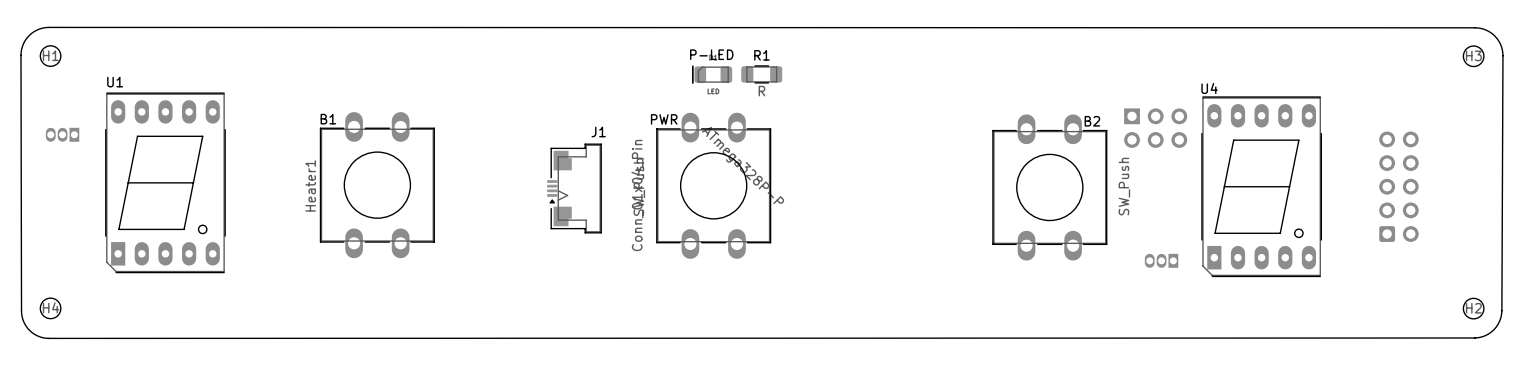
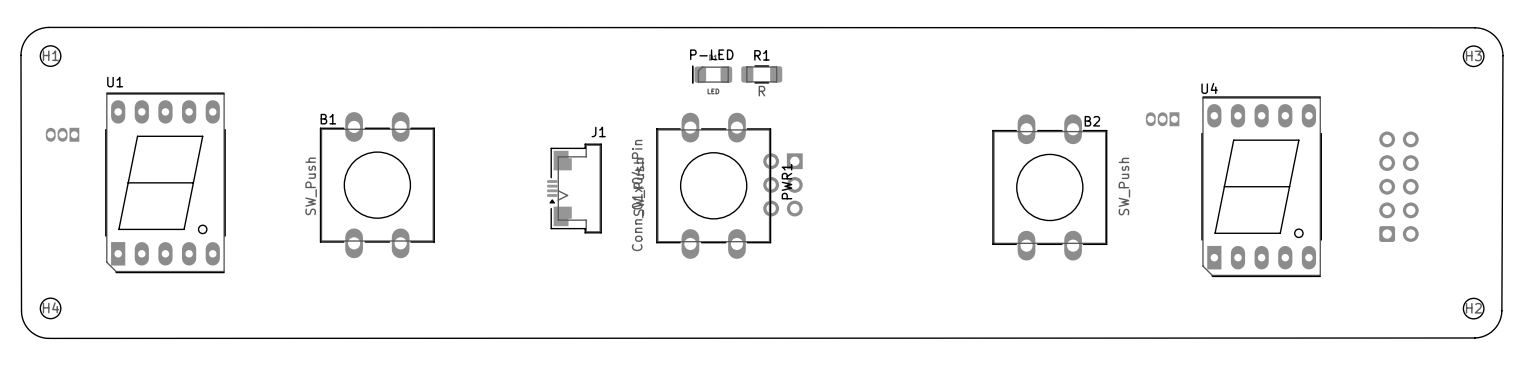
PWR name: PWR (664, 119) -> PWR1 (786, 181)
part: (1155, 128) -> none
part: ATmega328P-P (742, 165) -> none
part: none -> (782, 184)
B1 value: Heater1 (310, 185) -> SW_Push (311, 186)
part position: (1161, 260) -> (1162, 119)

